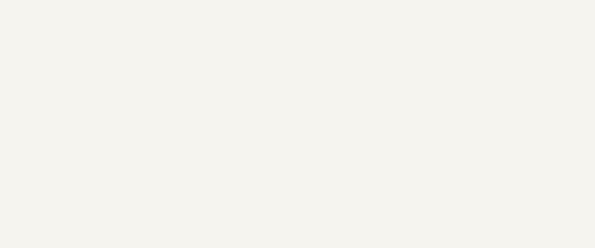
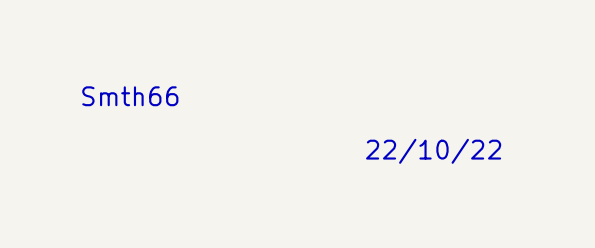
text: none -> Smth66 (130, 96)
text: none -> 22/10/22 (433, 151)

